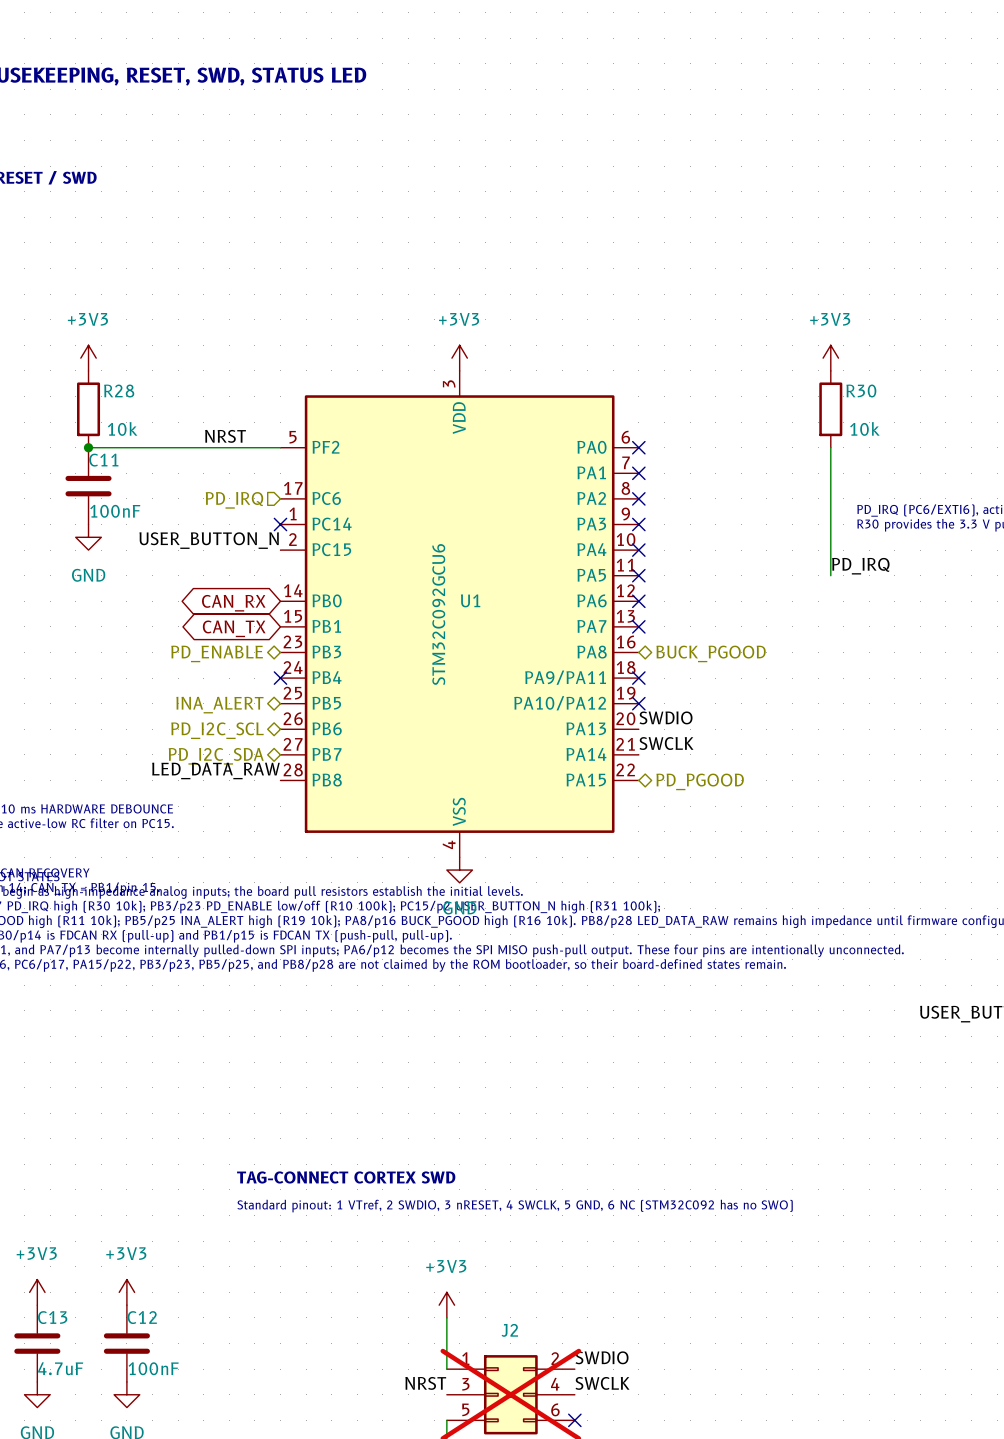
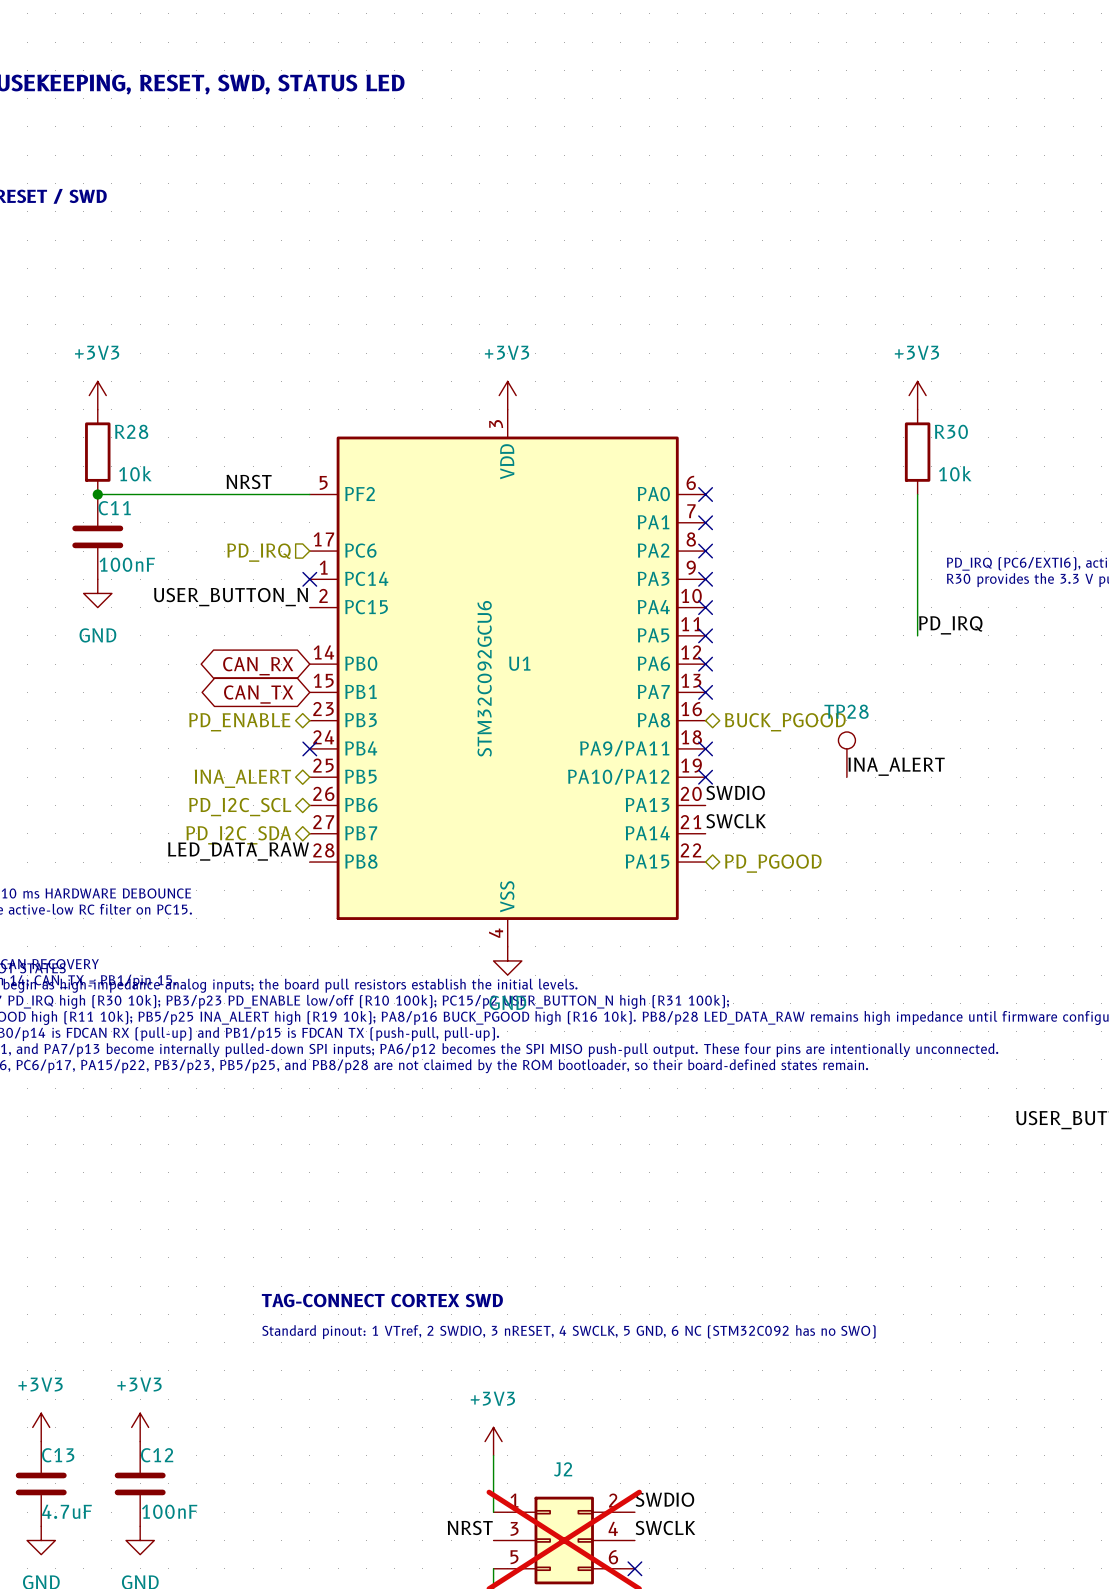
TP28: none -> (846, 754)
label: none -> INA_ALERT (896, 766)

